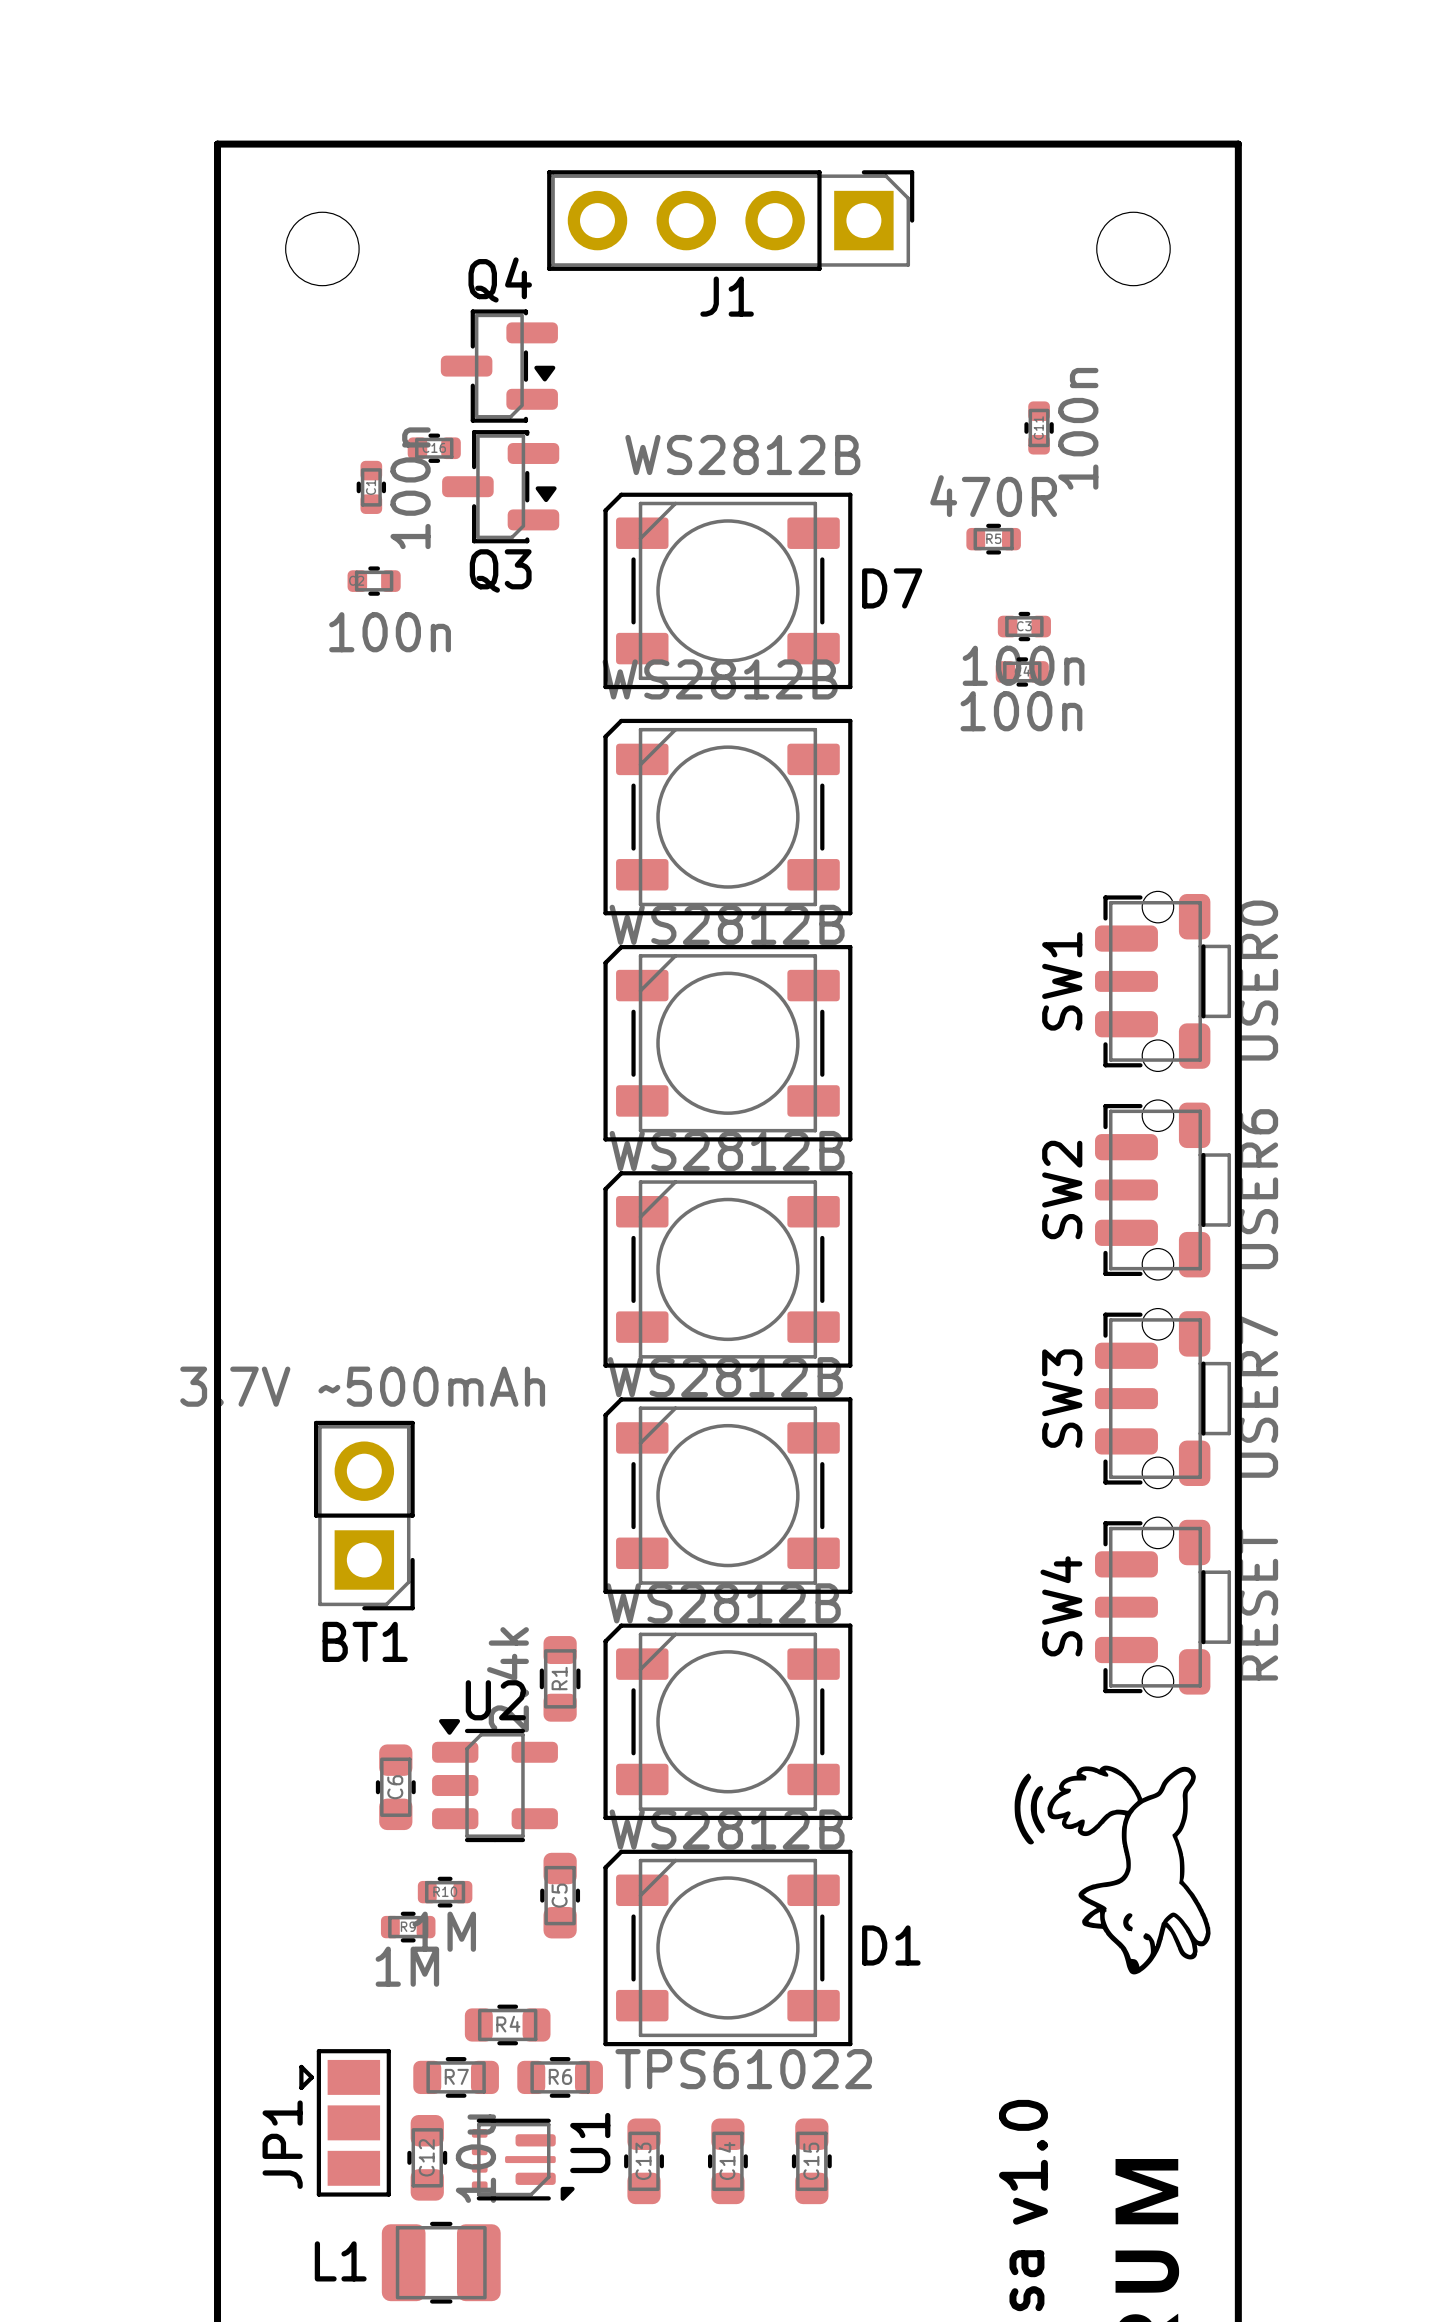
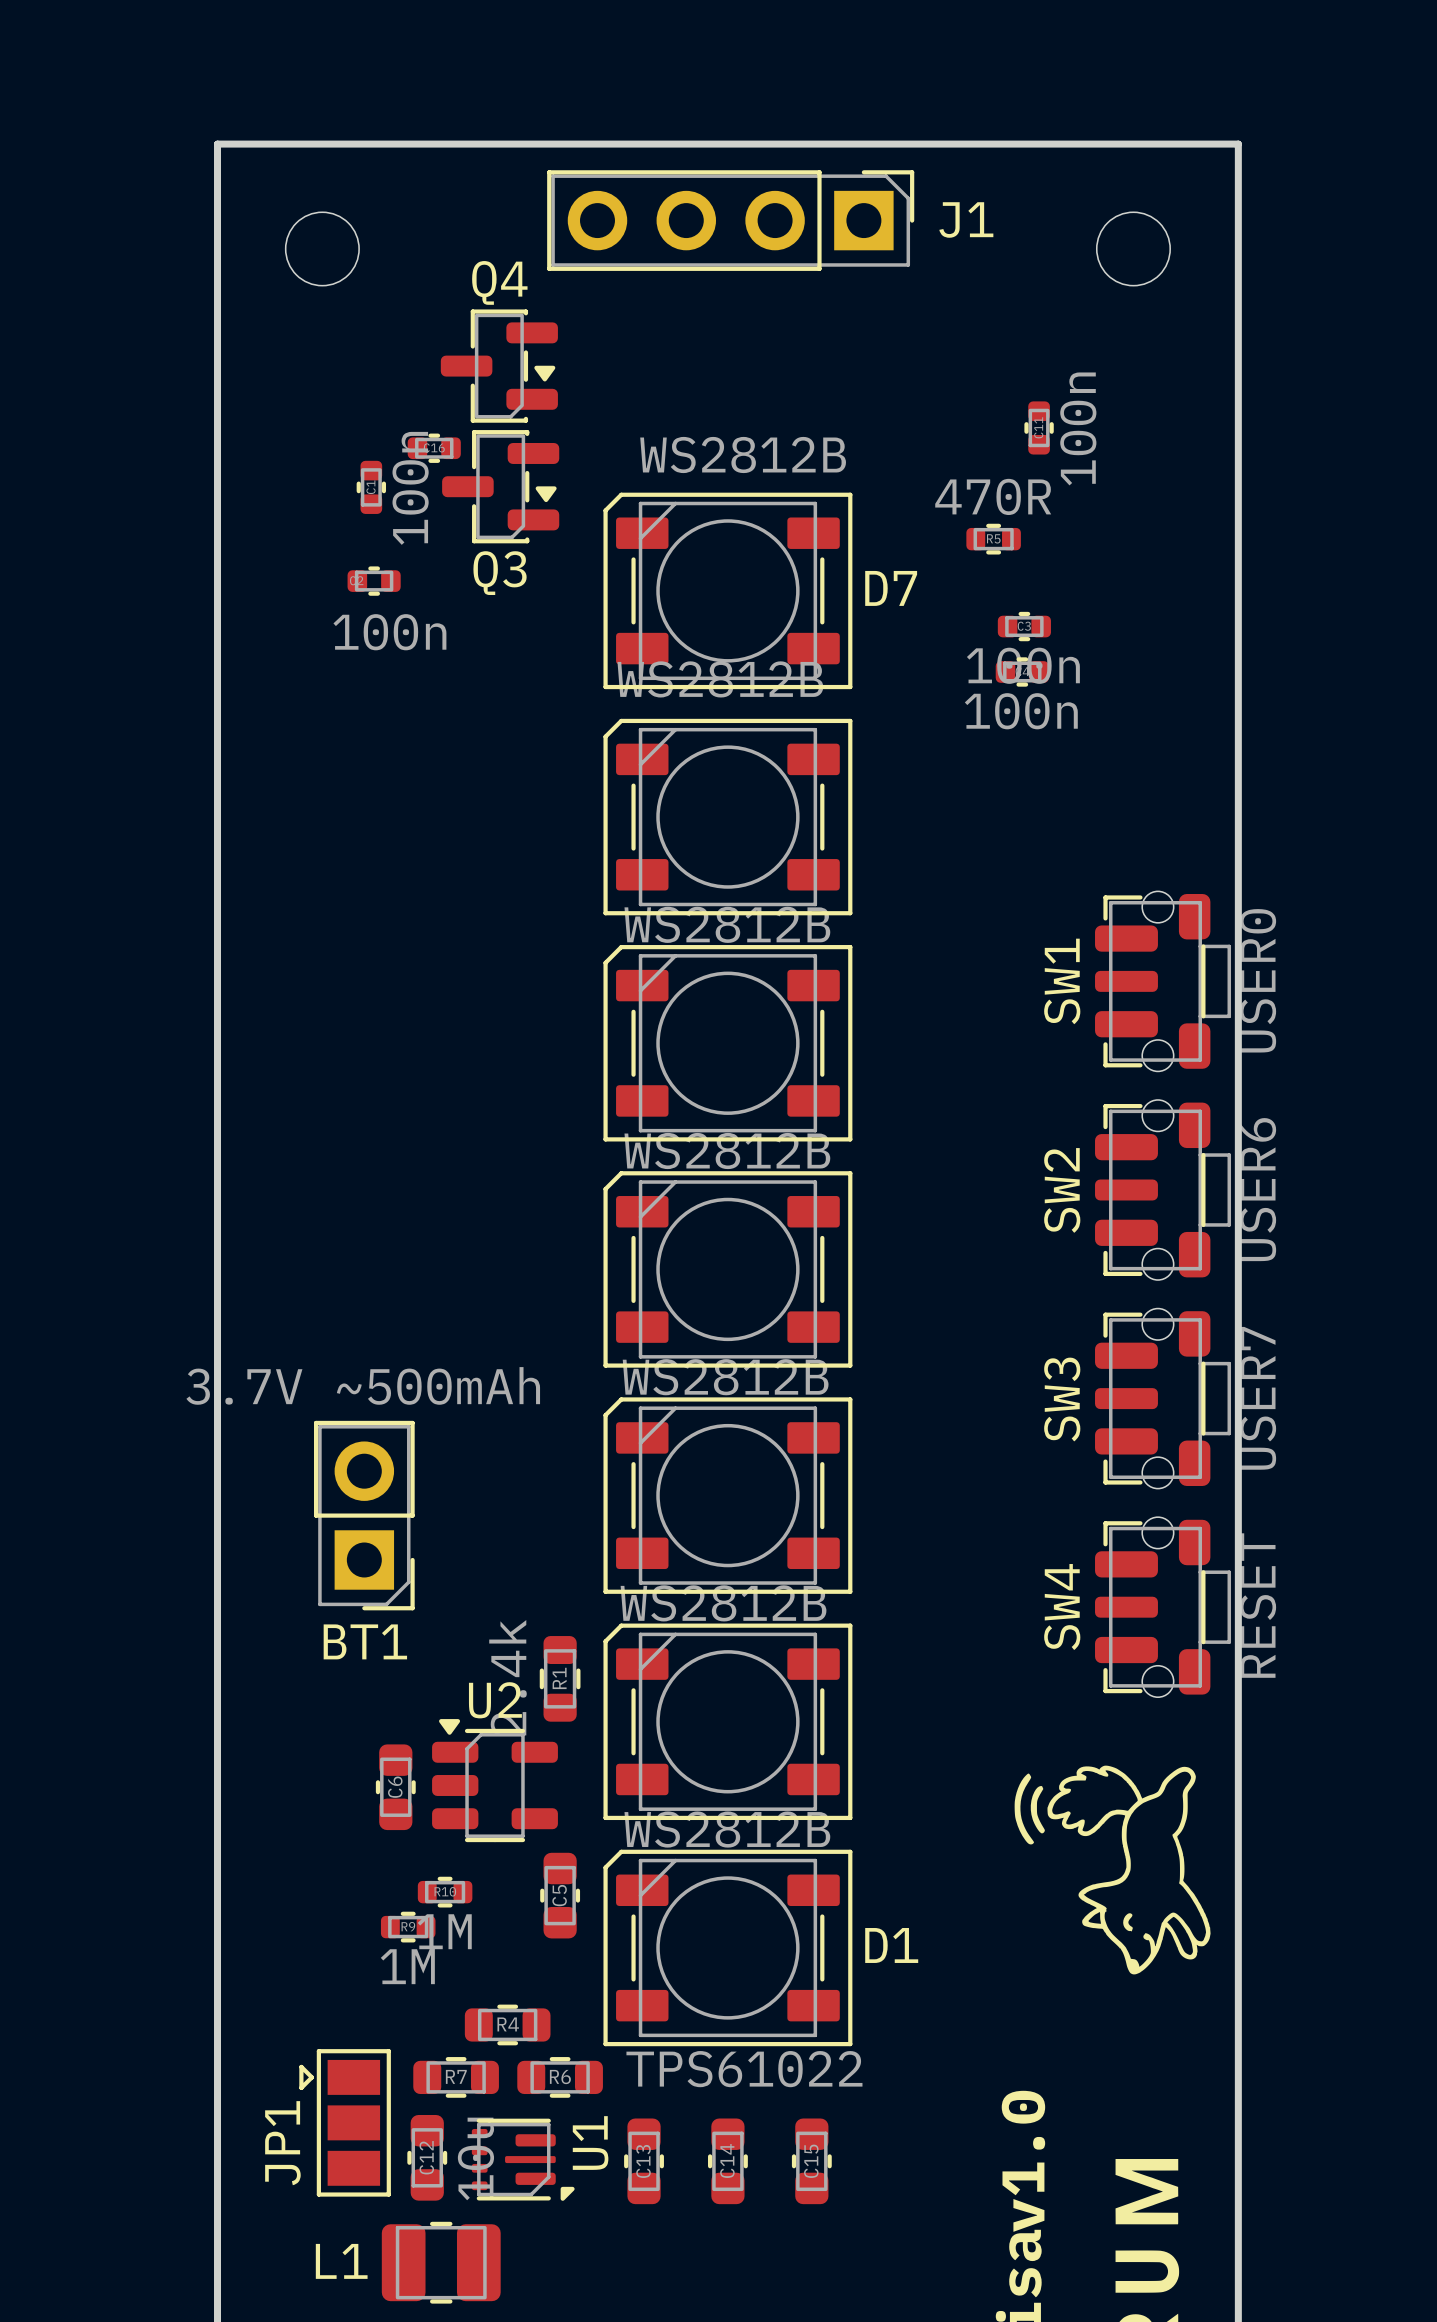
J1 name position: J1 (727, 296) -> J1 (966, 219)

